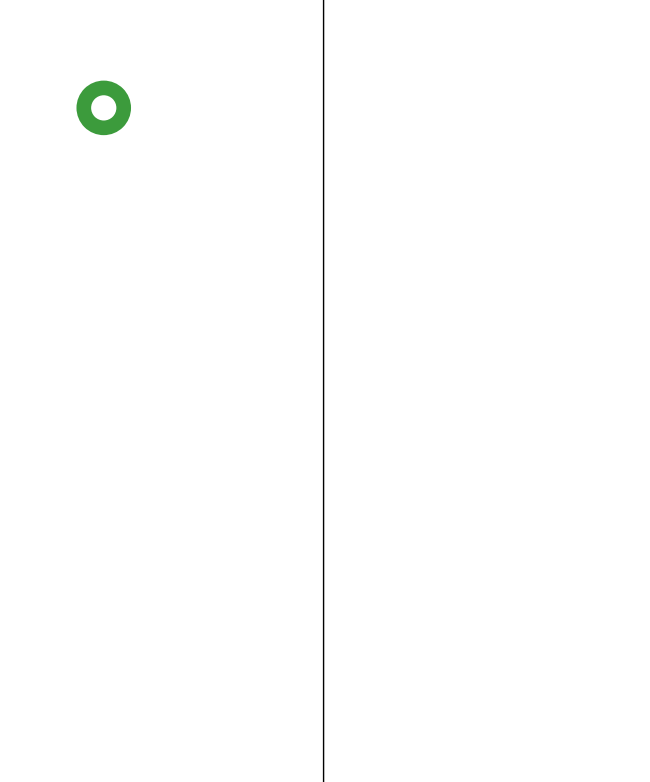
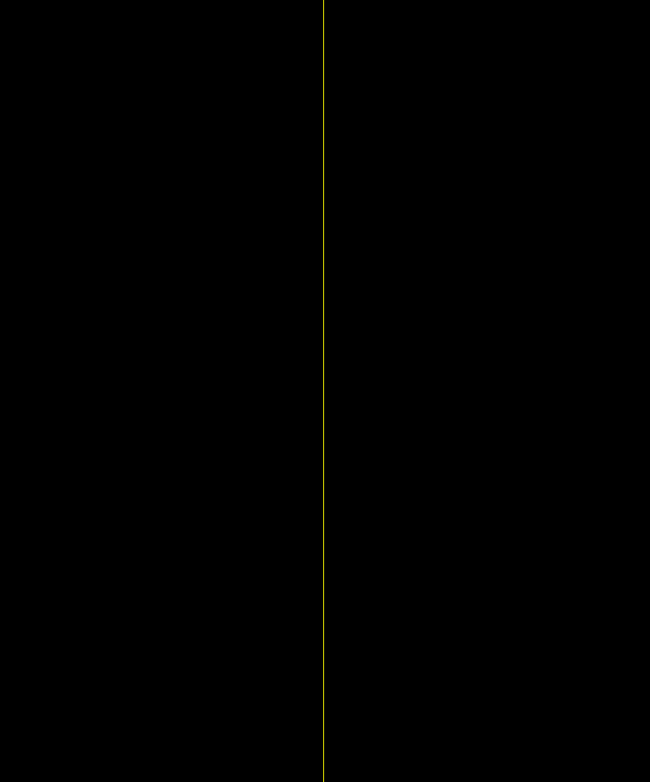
via: (103, 107) -> none

